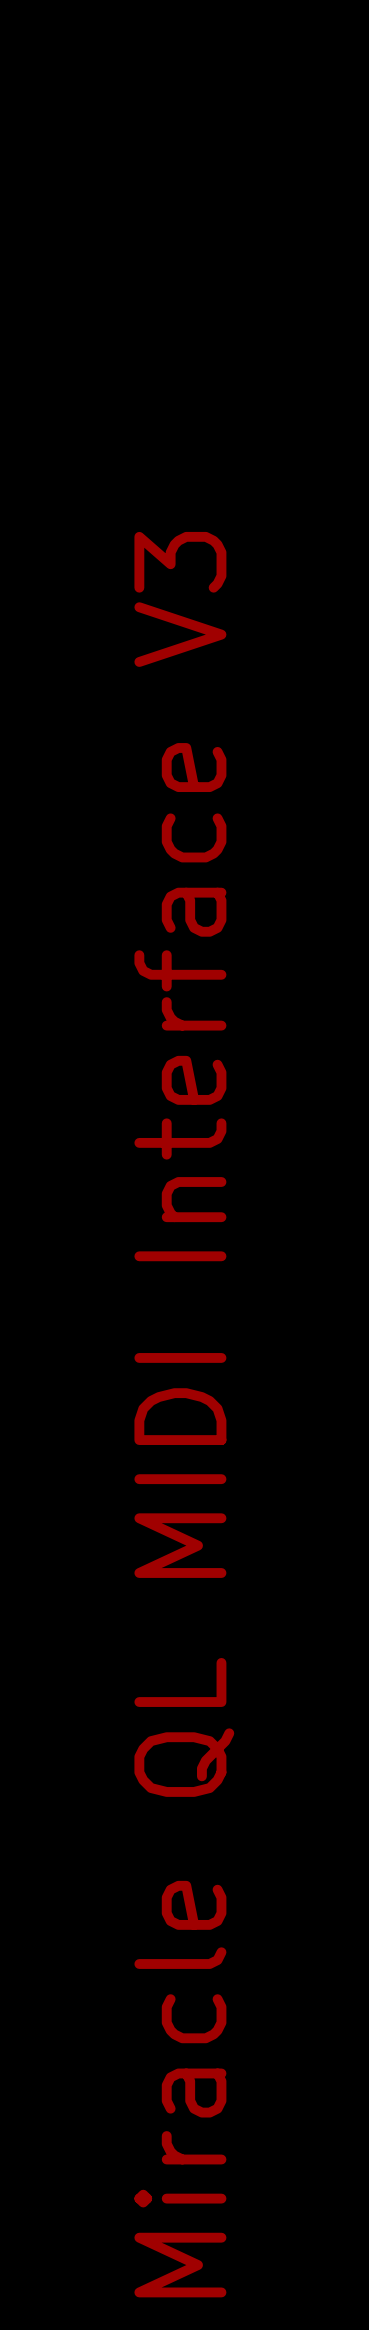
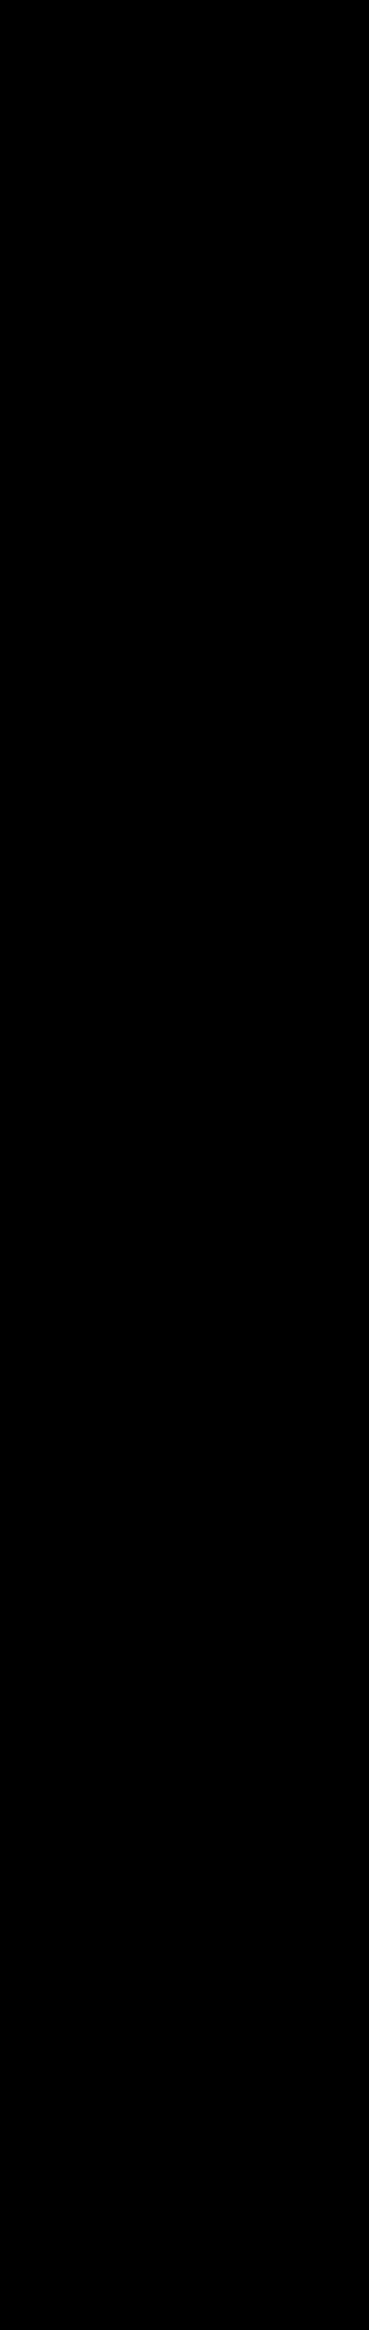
text: Miracle QL MIDI Interface V3 (184, 1414) -> none

